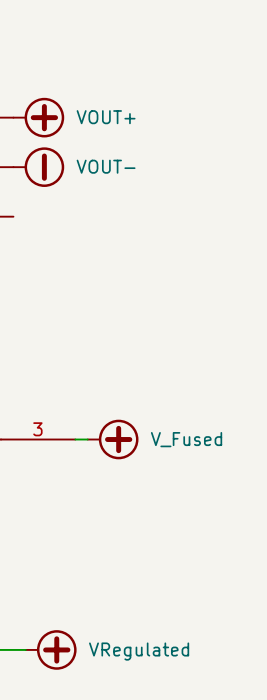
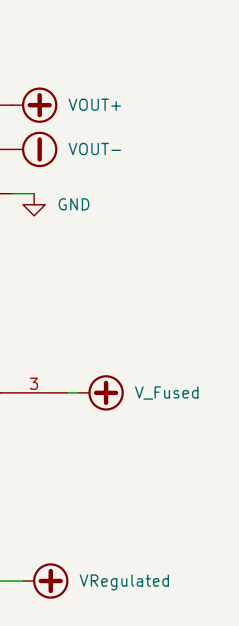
wire: none -> (12, 193) (34, 193)
power symbol: none -> GND (34, 204)

